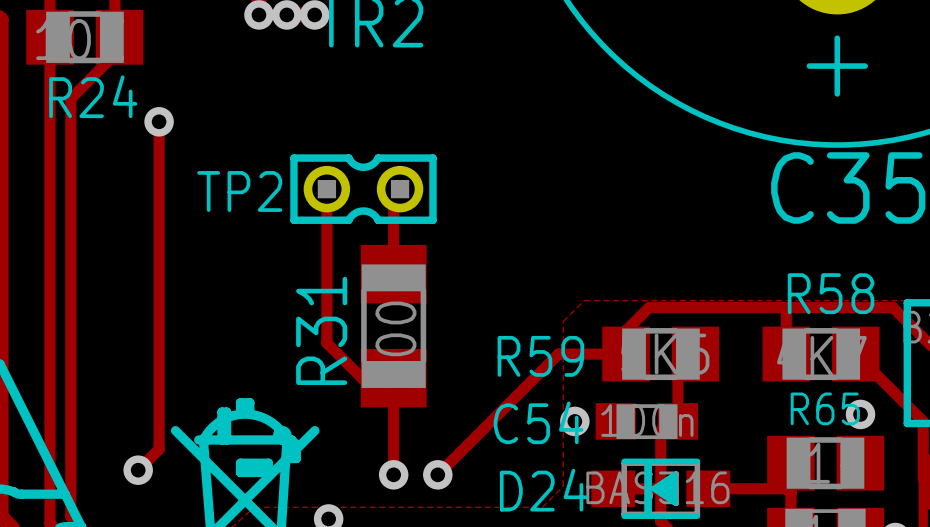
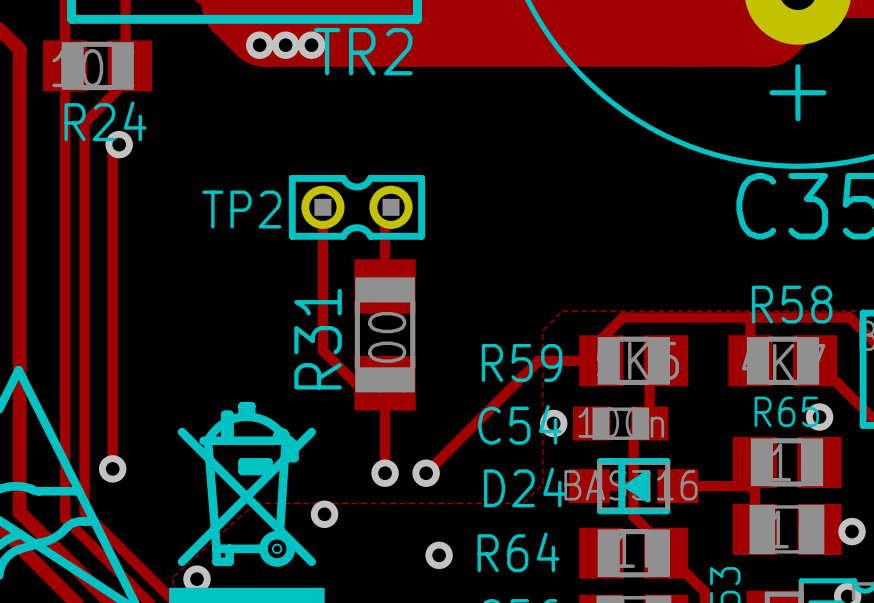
track: none -> (119, 144) (112, 151) (112, 468)
track: (159, 121) (159, 449) (138, 470) -> none
via position: (159, 121) -> (119, 144)
via position: (138, 470) -> (112, 468)

